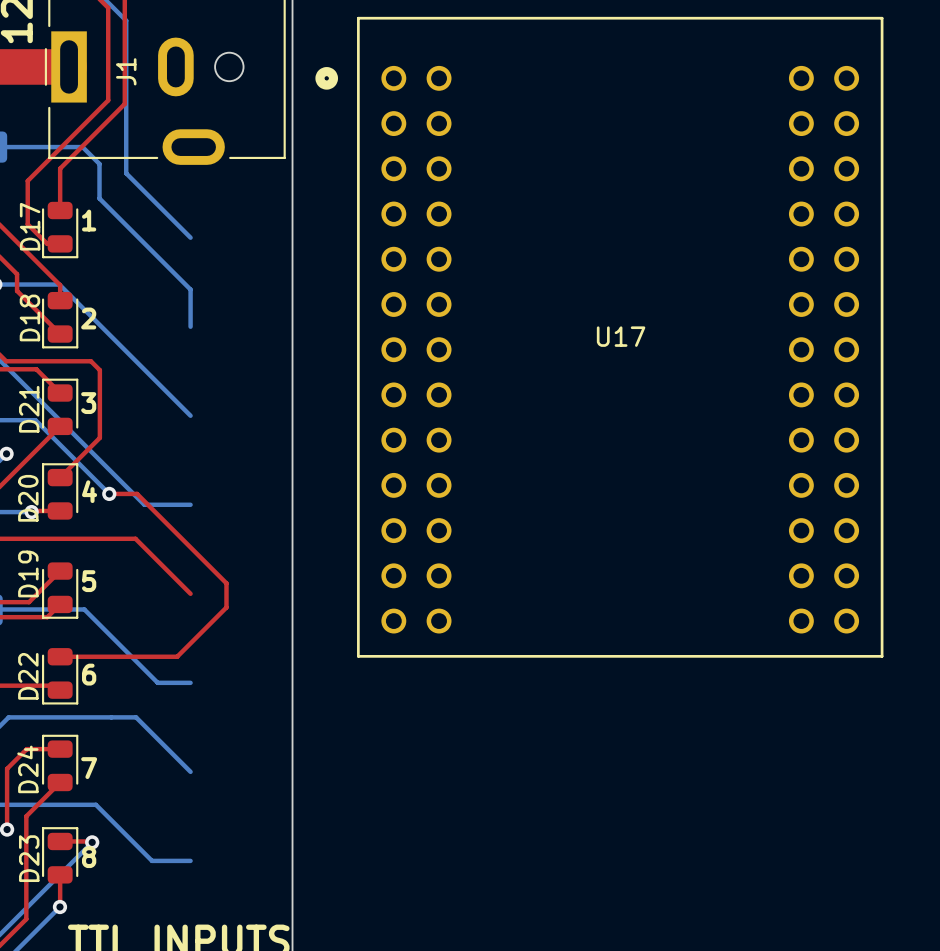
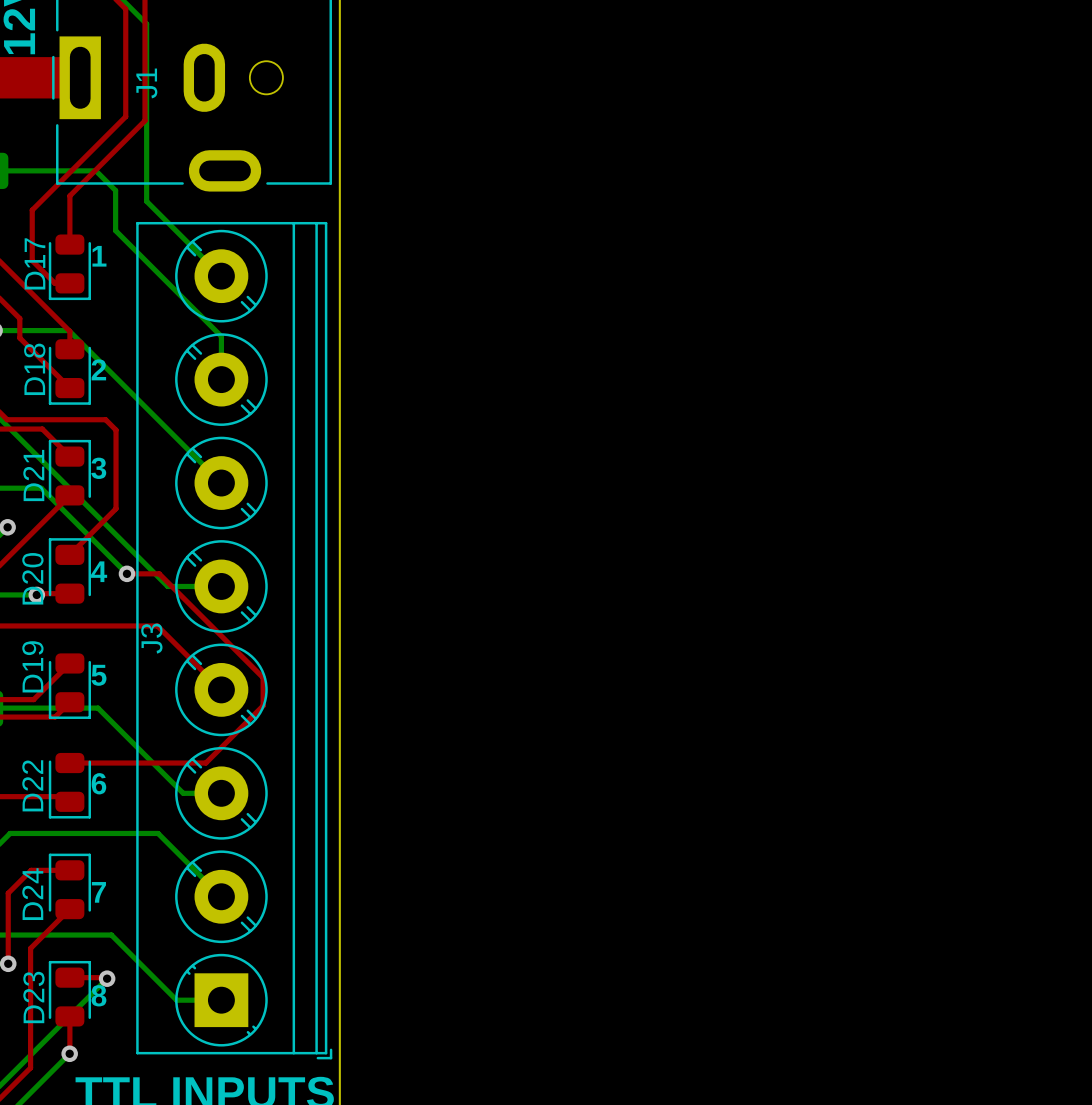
U17: (599, 337) -> none
J3: none -> (234, 640)

